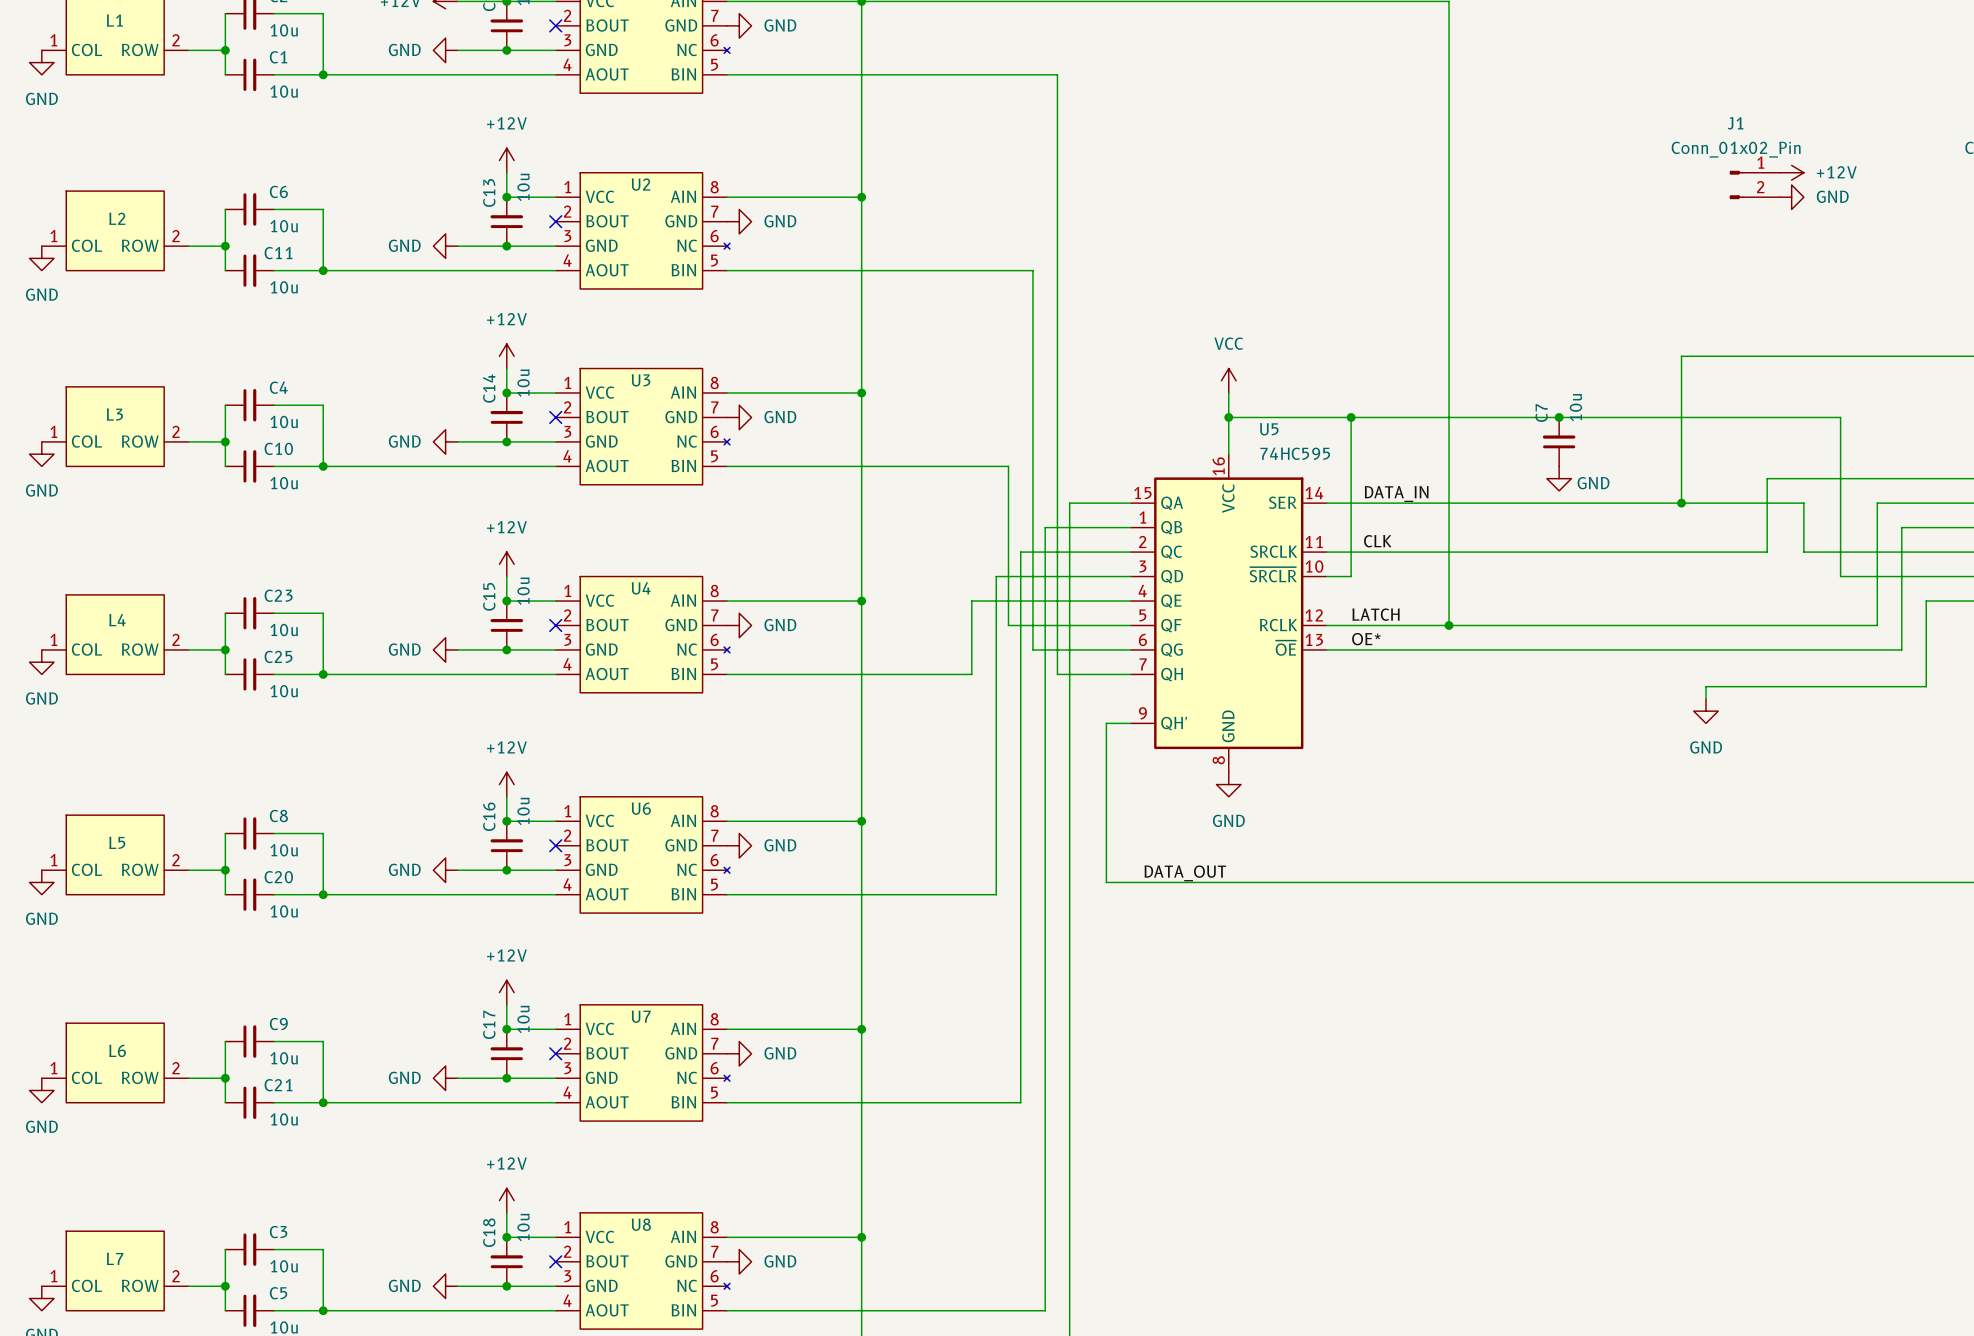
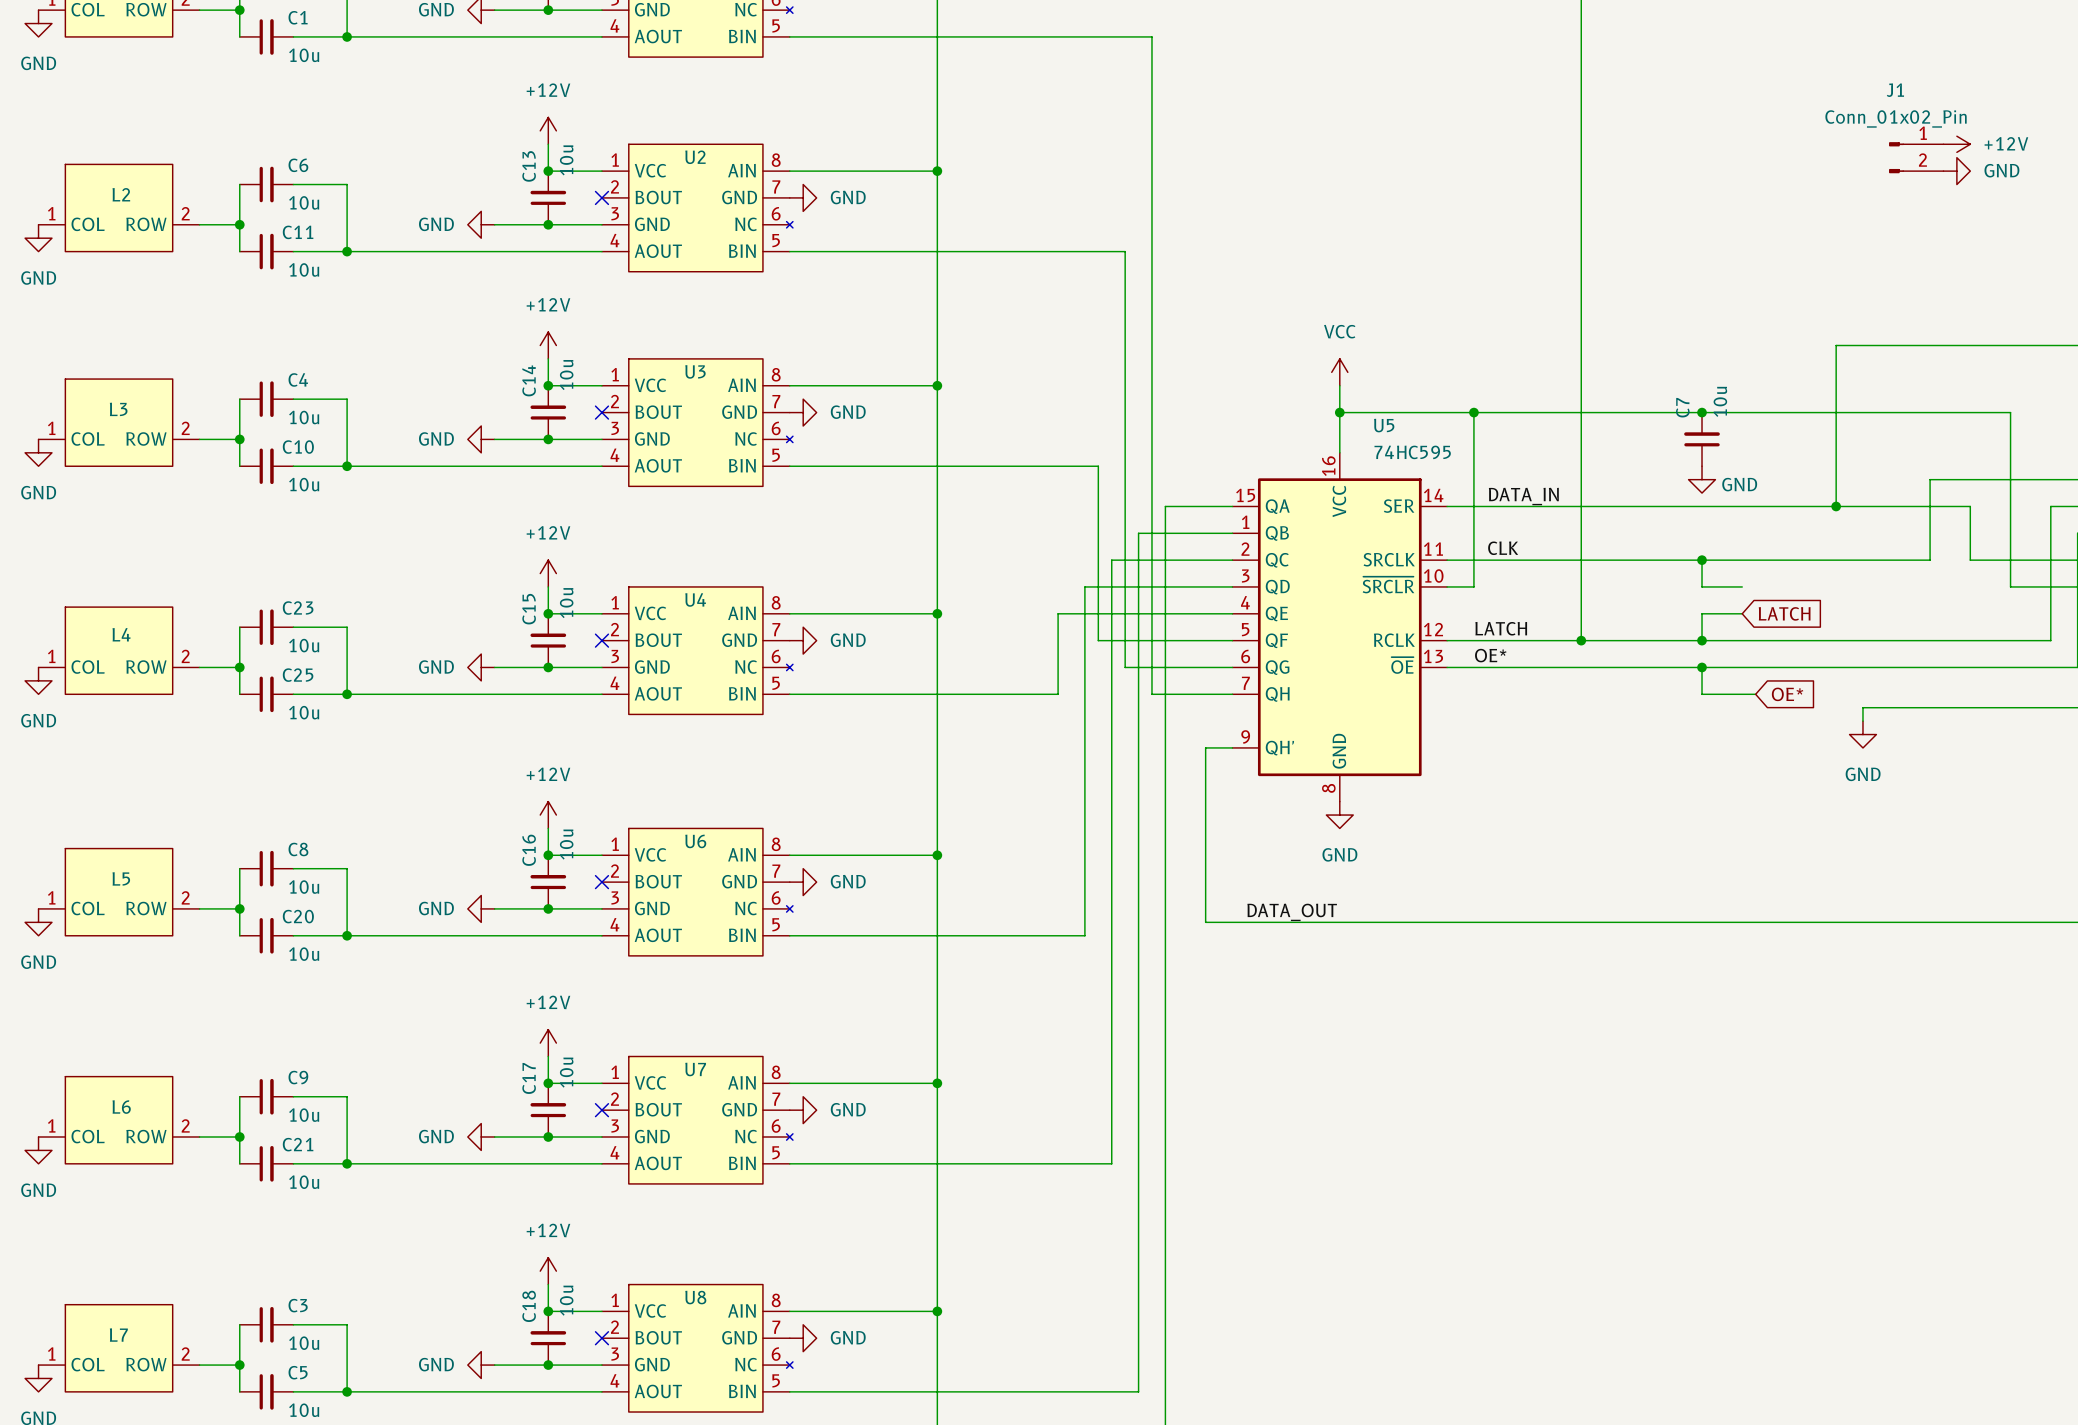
wire: none -> (1702, 560) (1702, 586) (1742, 586)
junction: none -> (1702, 560)
wire: none -> (1742, 613) (1702, 613) (1702, 640)
global label: none -> LATCH (1784, 613)
junction: none -> (1702, 640)
wire: none -> (1702, 667) (1702, 694) (1755, 694)
junction: none -> (1702, 667)
global label: none -> OE* (1787, 694)

